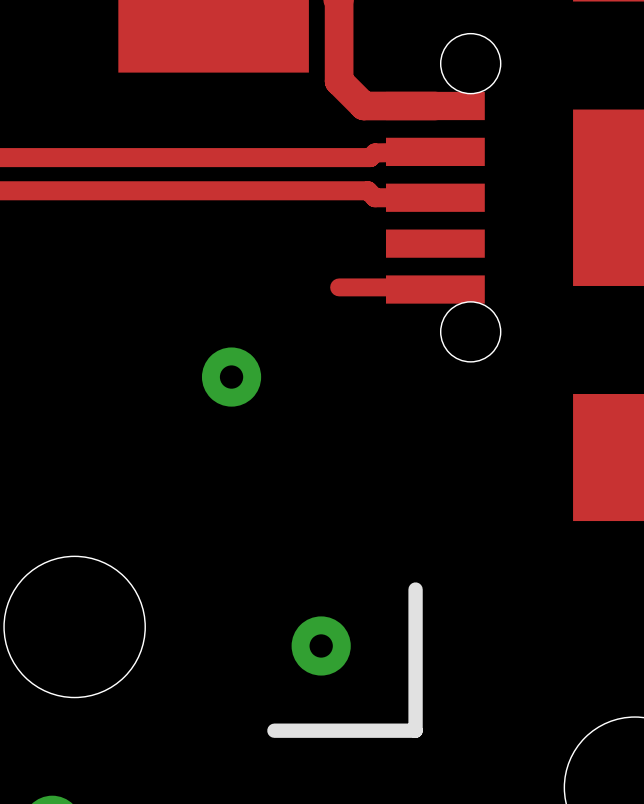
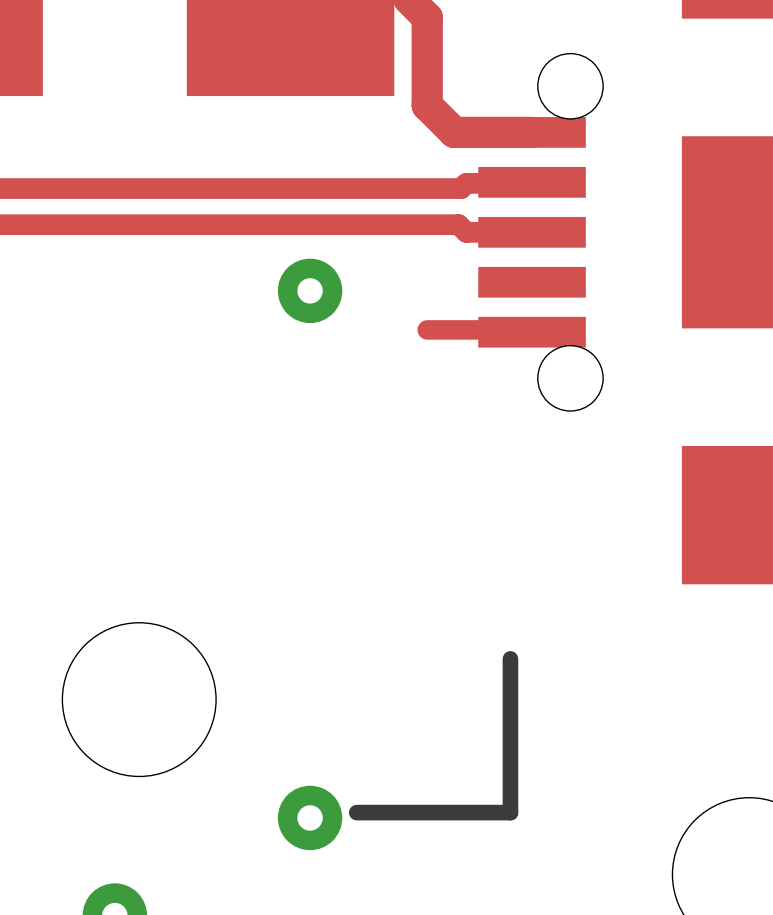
via position: (231, 377) -> (310, 290)
via position: (321, 645) -> (310, 817)

